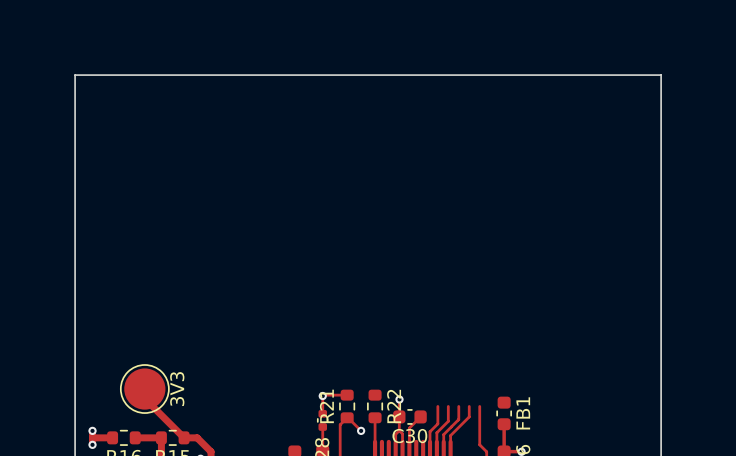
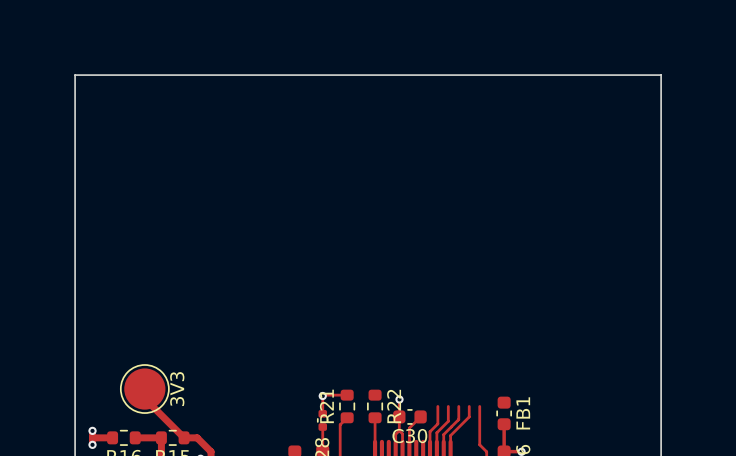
track: (347, 417) (361, 430) -> none
via: (361, 430) -> none

